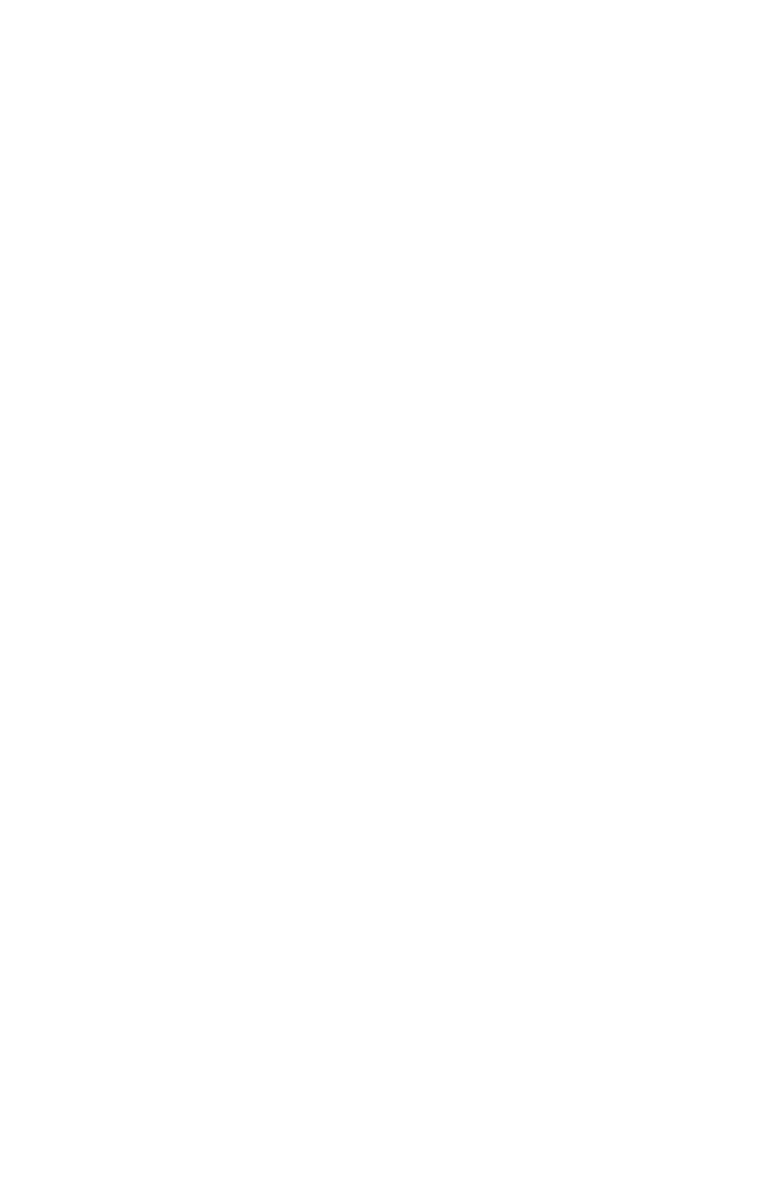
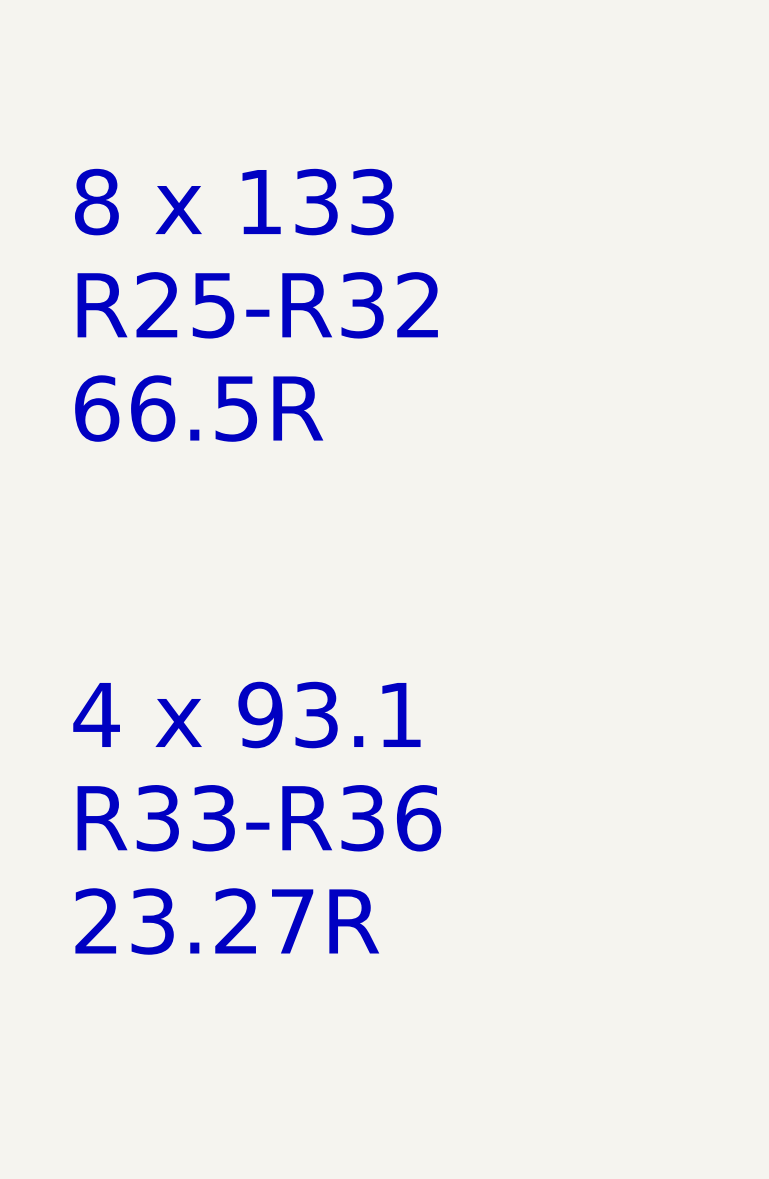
text: none -> 8 x 133 (234, 202)
text: none -> R25-R32 (257, 305)
text: none -> 66.5R (199, 408)
text: none -> 4 x 93.1 (246, 715)
text: none -> R33-R36 (259, 818)
text: none -> 23.27R (227, 921)

